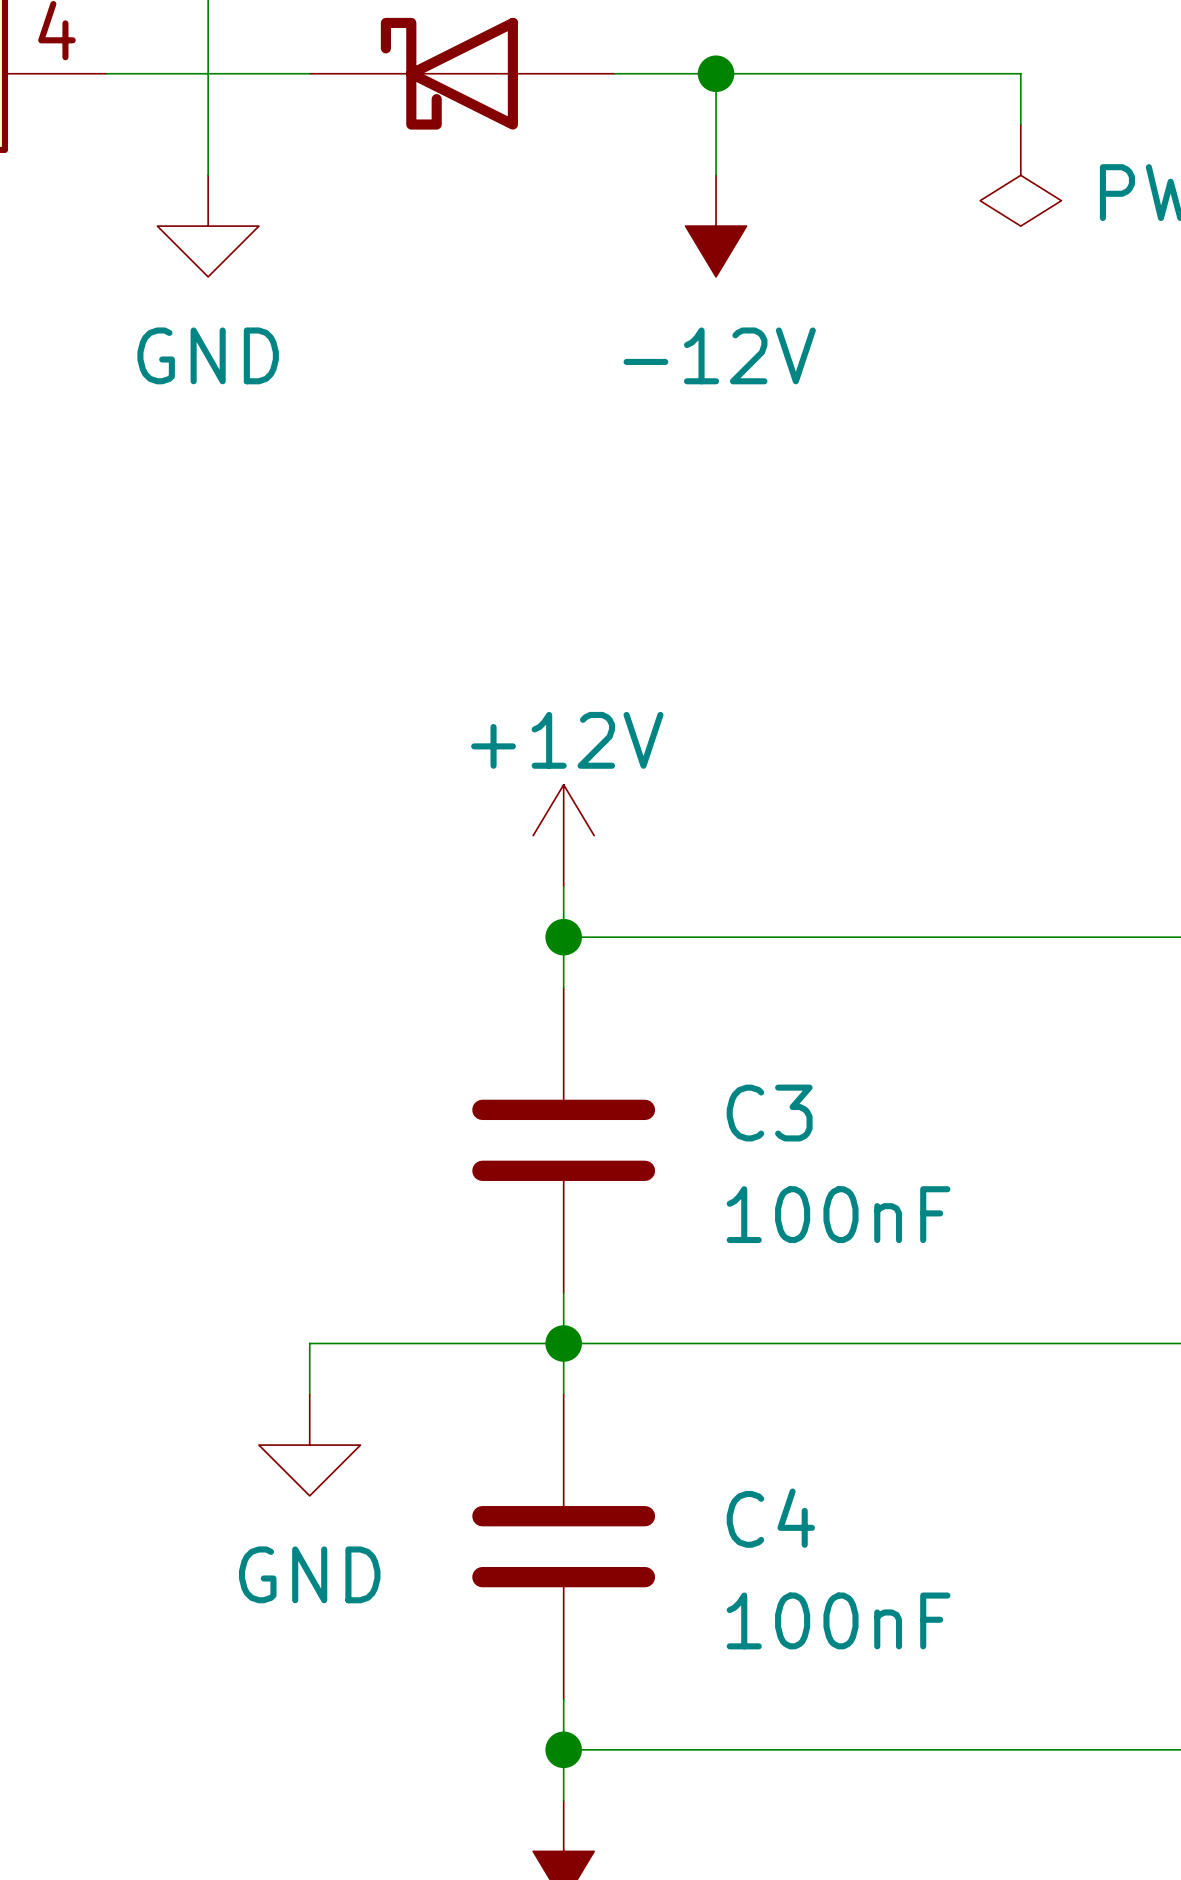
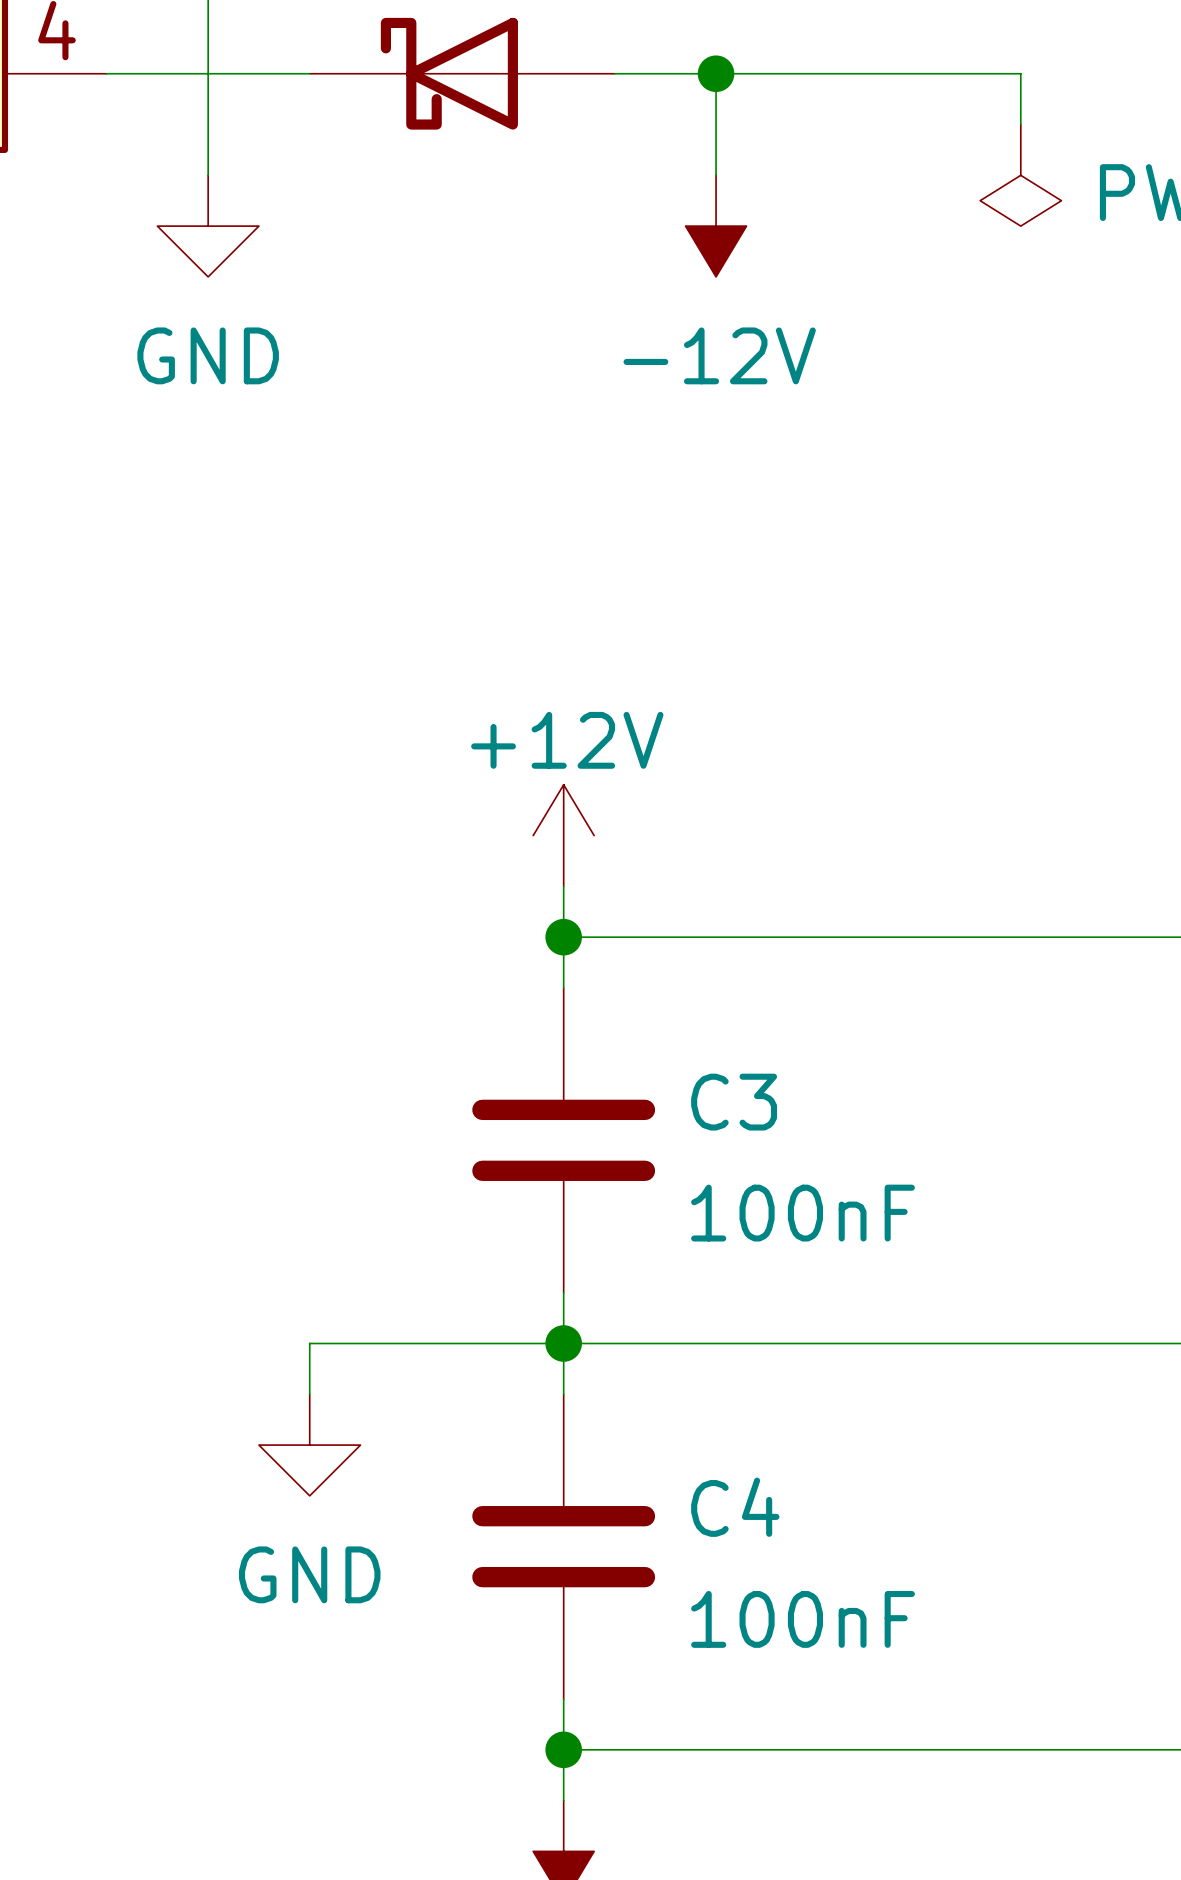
C3 name position: C3 (769, 1113) -> C3 (734, 1102)
C3 value position: 100nF (838, 1214) -> 100nF (803, 1213)
C4 name position: C4 (770, 1518) -> C4 (735, 1507)
C4 value position: 100nF (838, 1620) -> 100nF (803, 1619)

